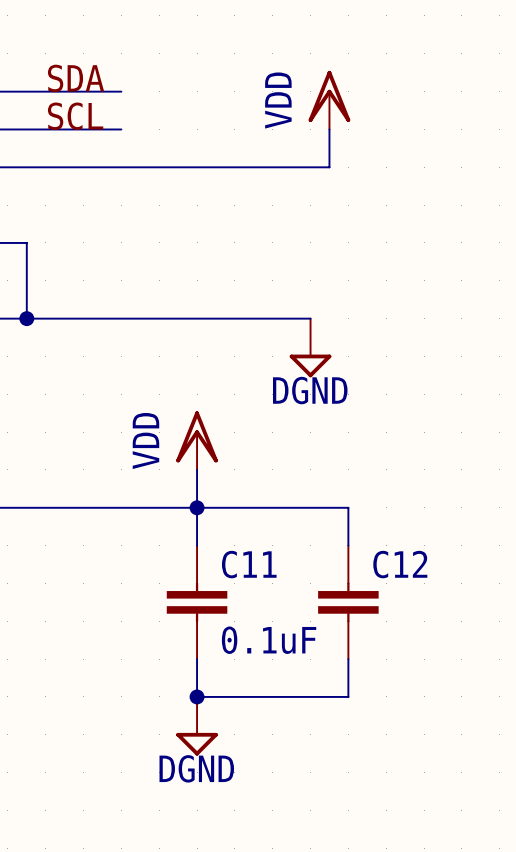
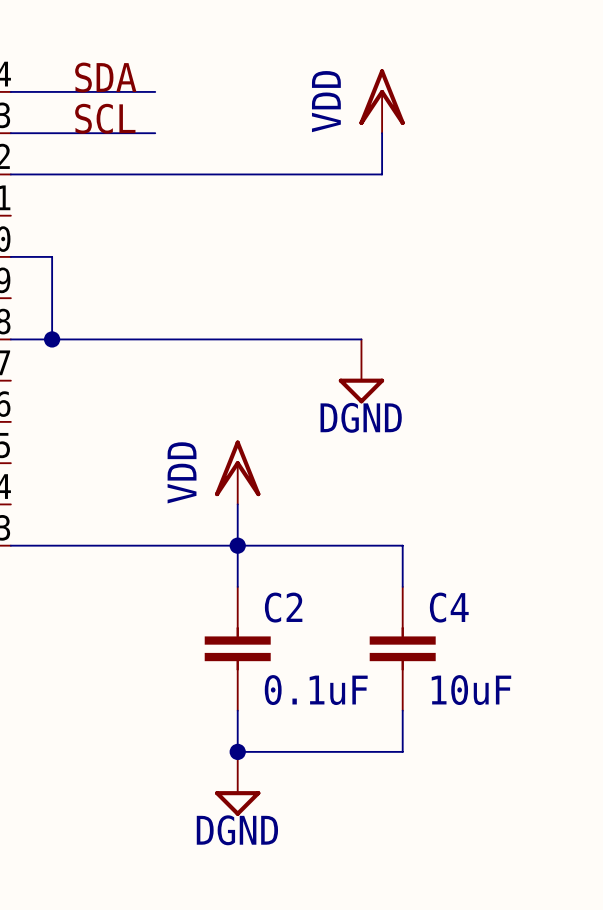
C11 name: C11 (249, 564) -> C2 (283, 607)
C12 name: C12 (400, 564) -> C4 (449, 607)
C12 value: none -> 10uF (471, 690)

